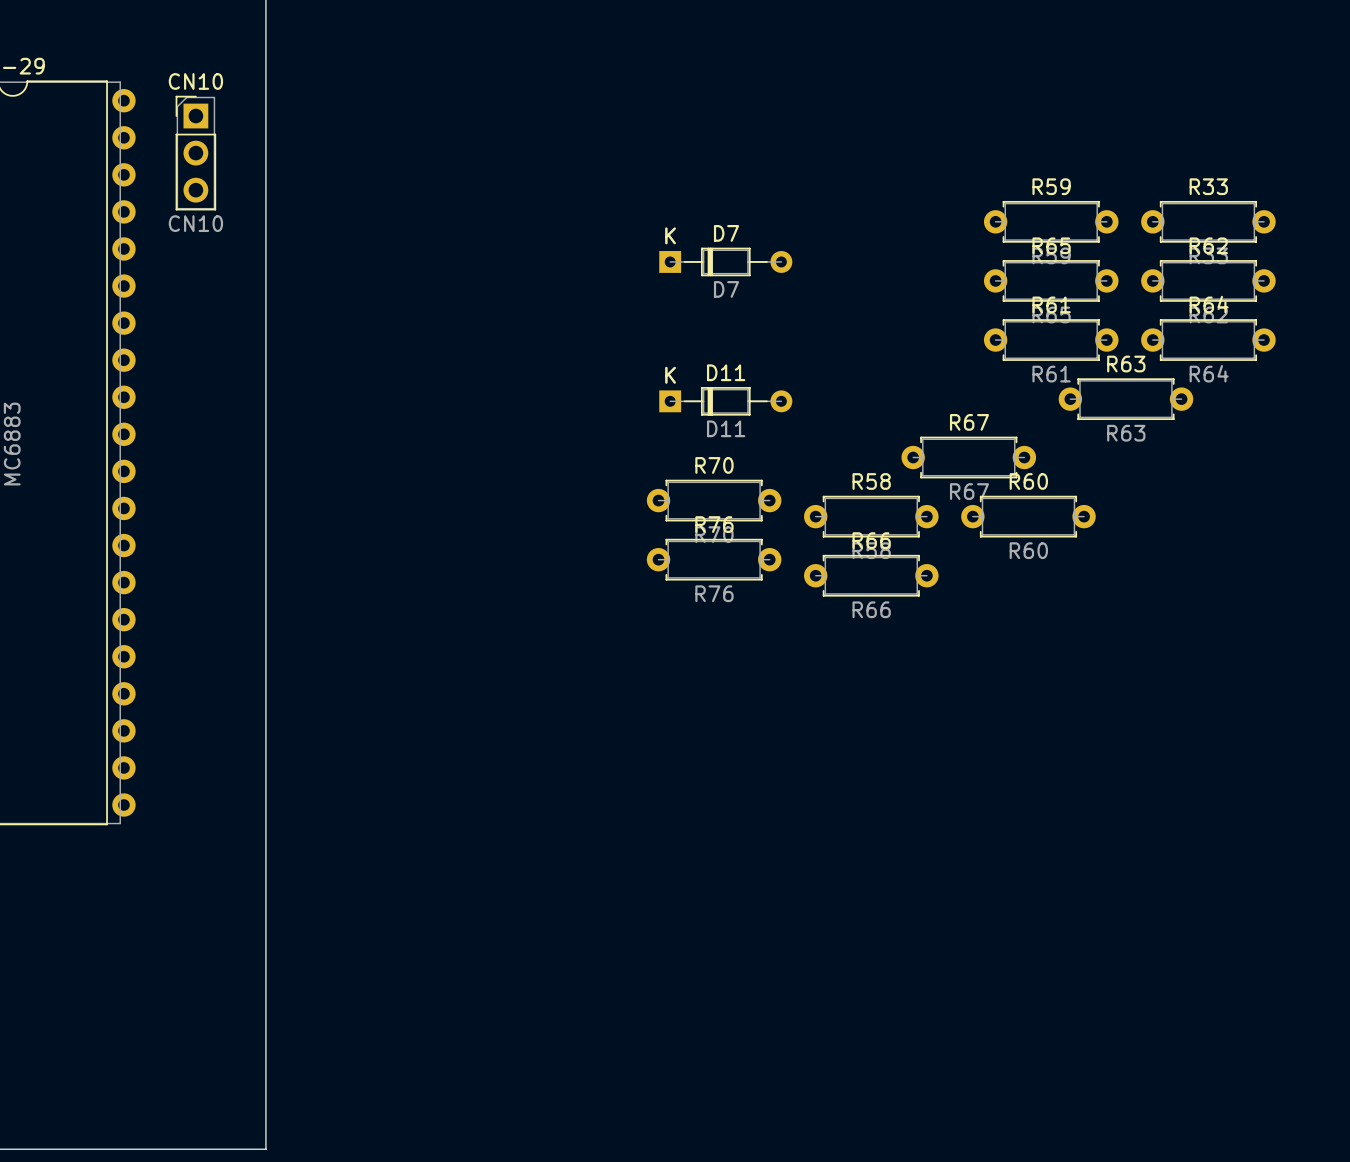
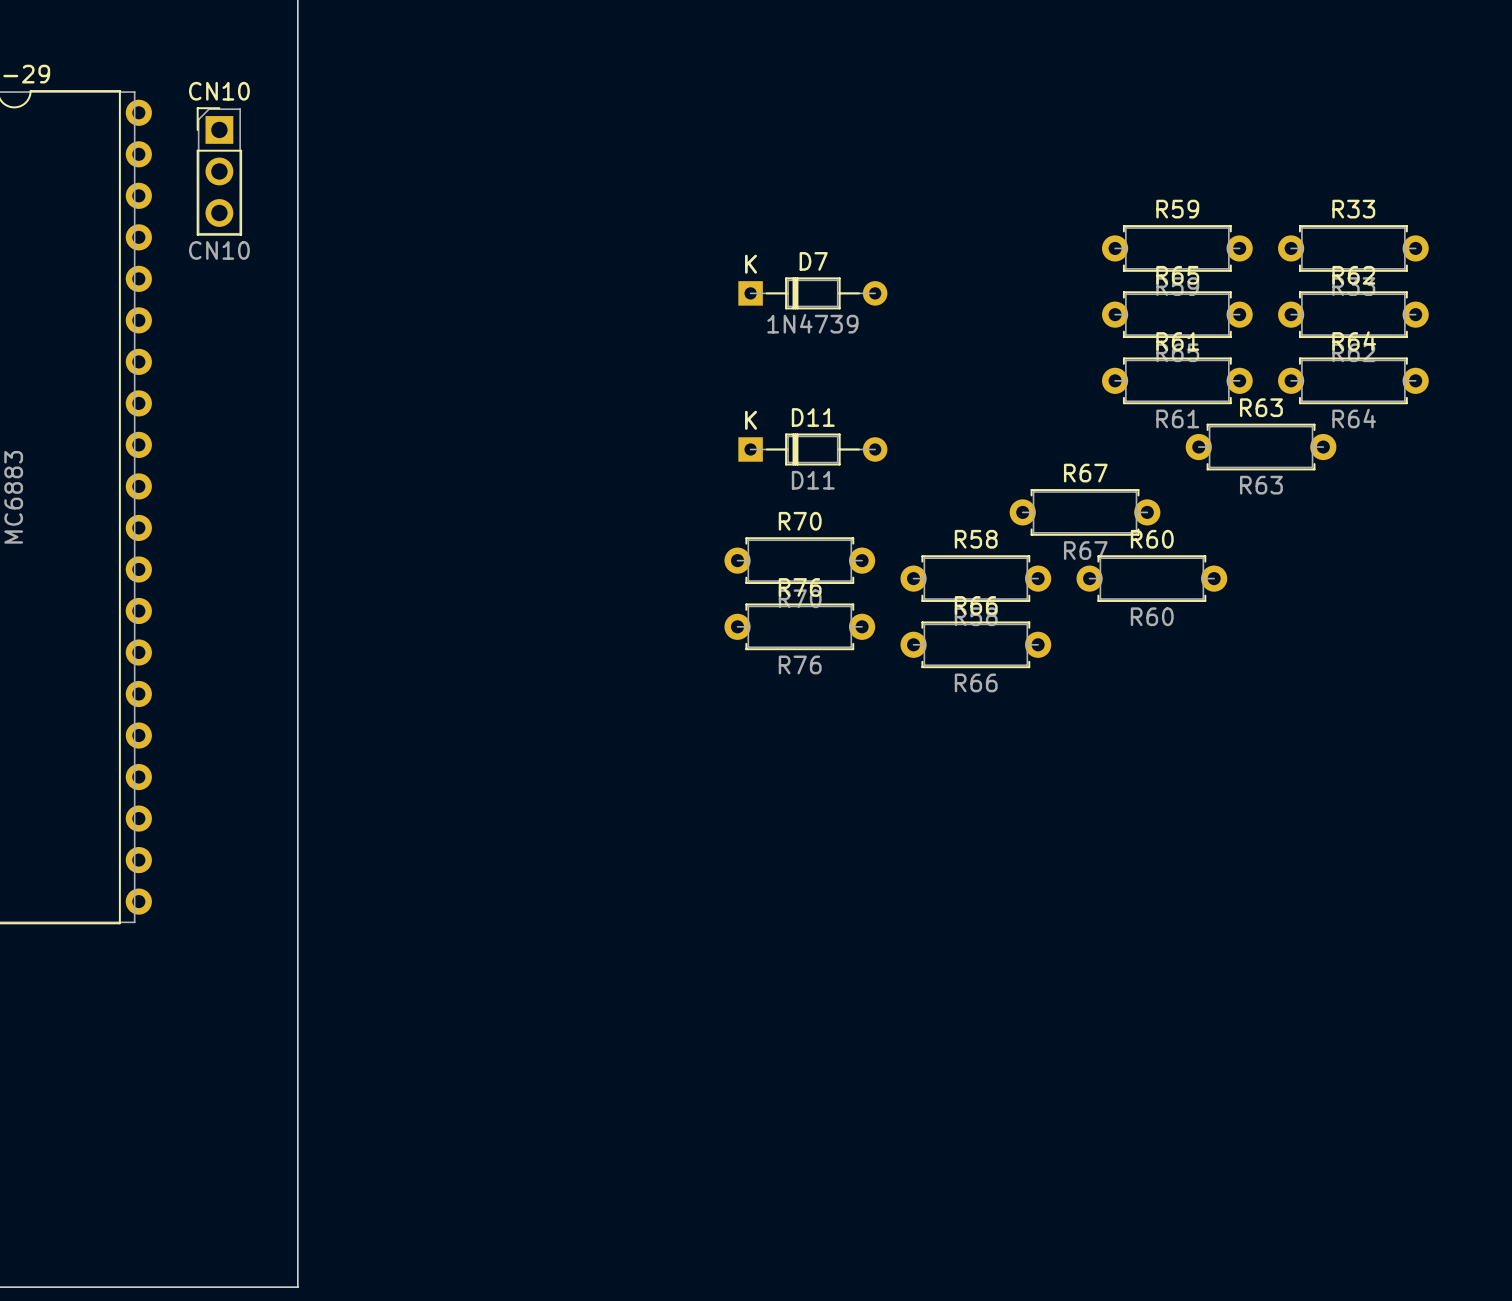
D7 value: D7 (726, 289) -> 1N4739 (812, 323)

